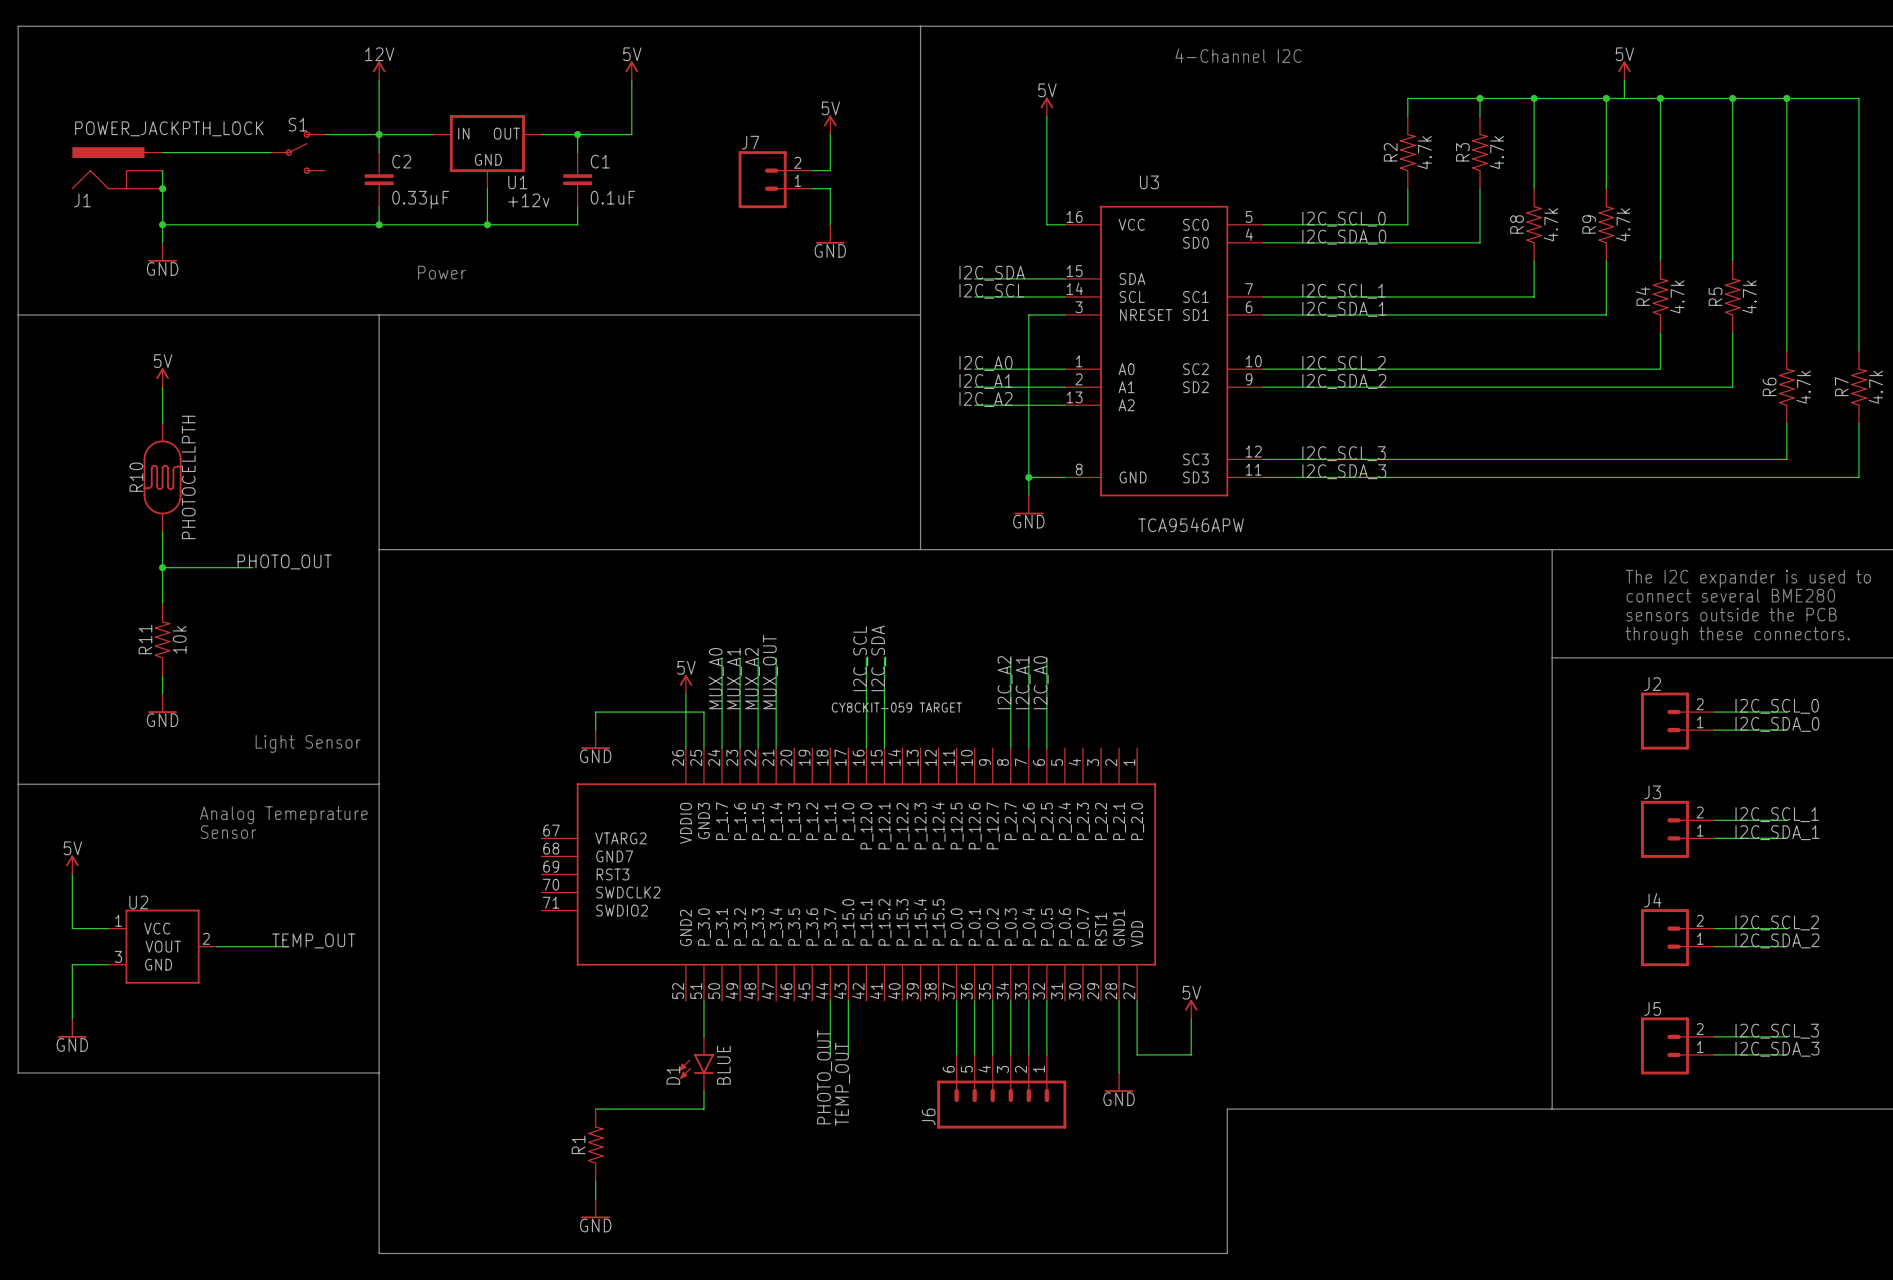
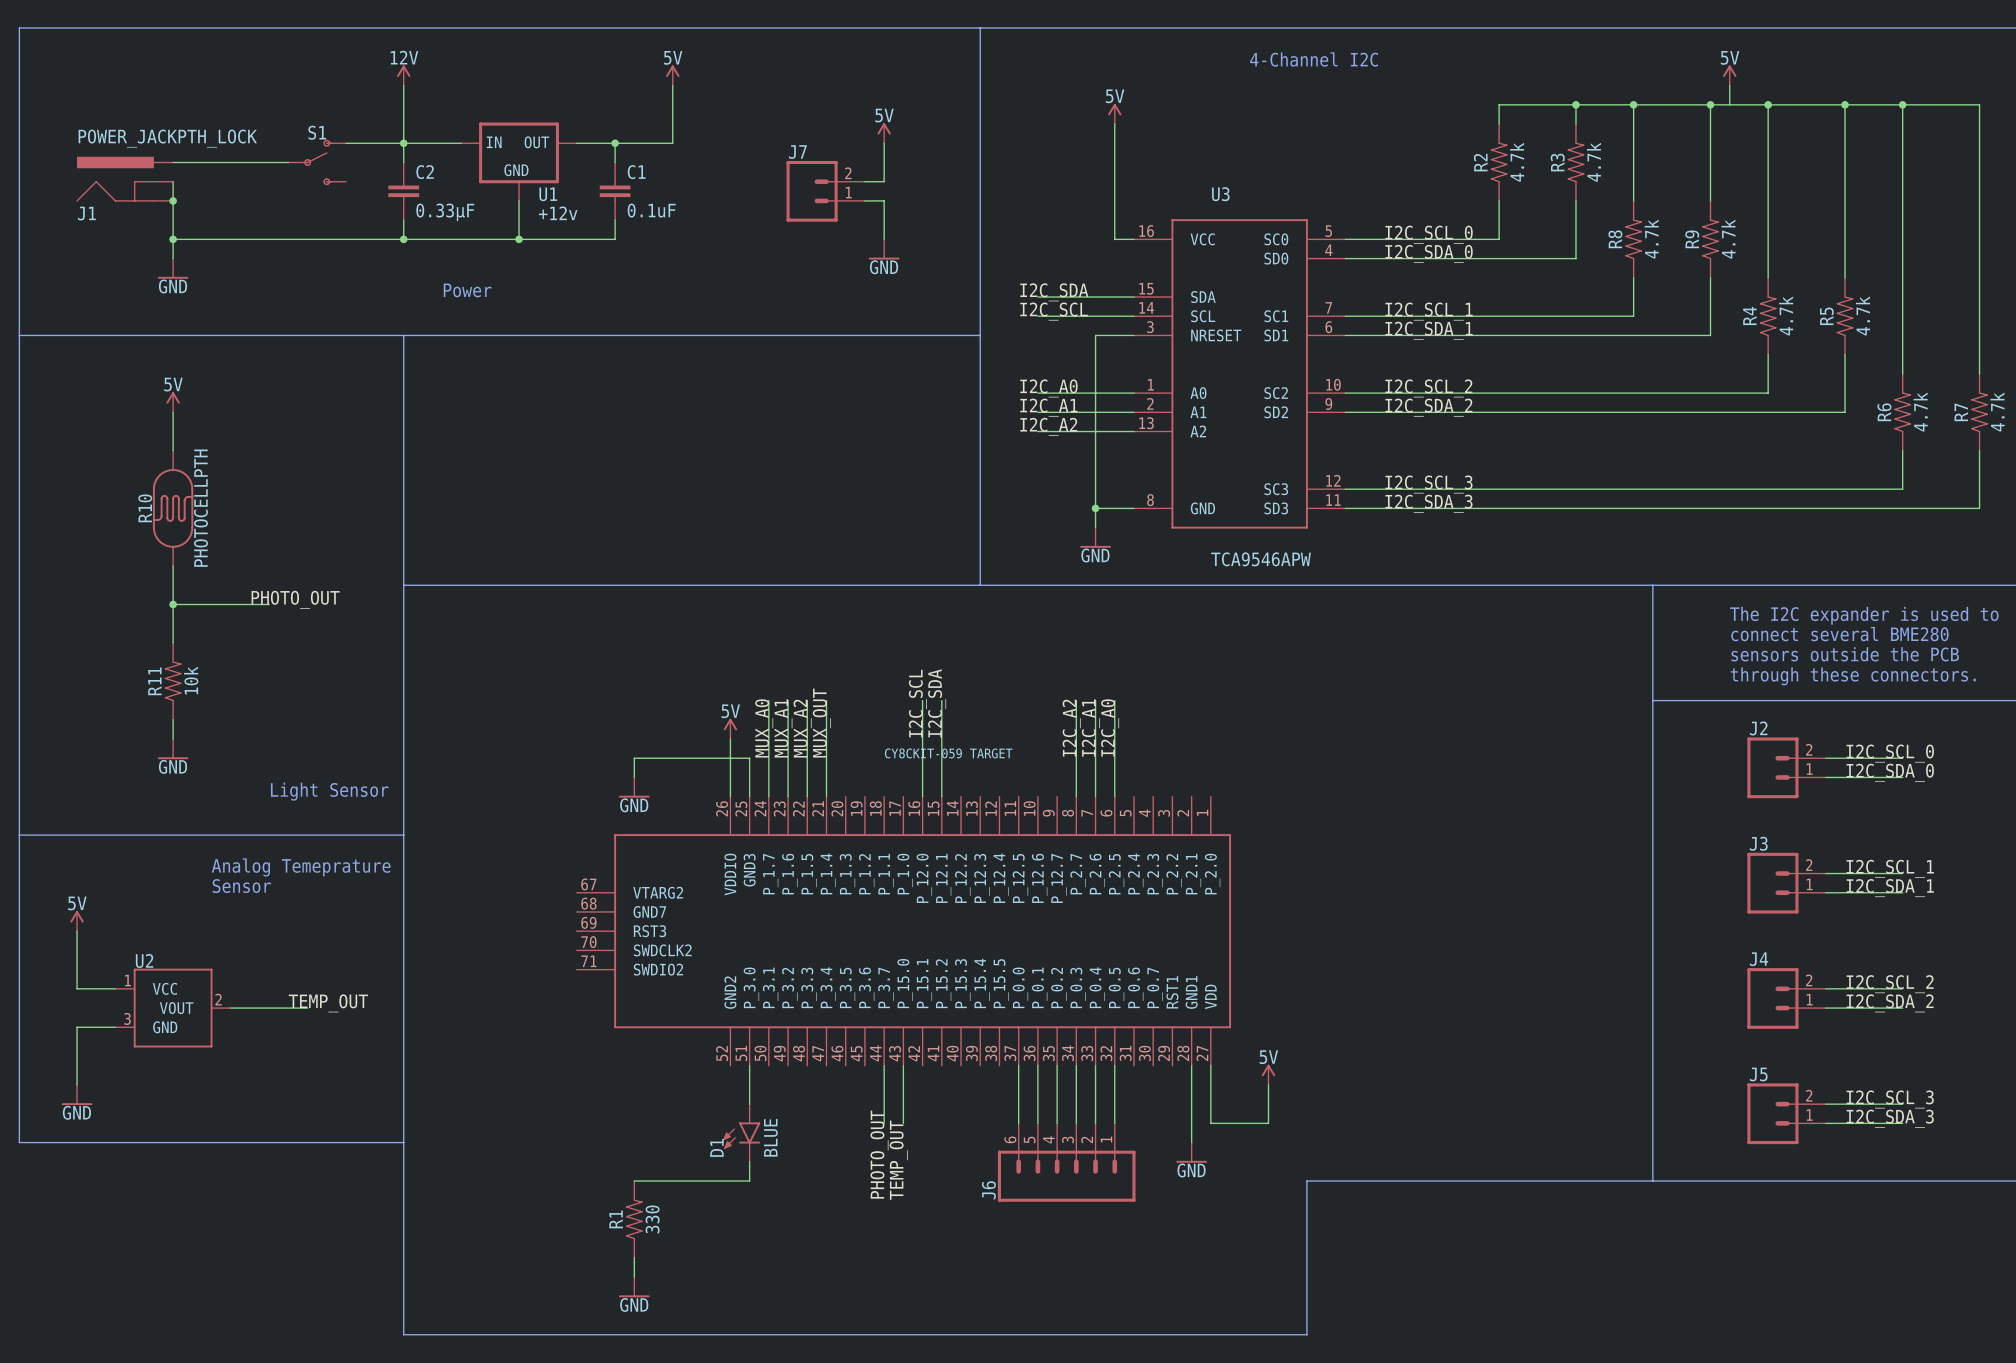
R1 value: none -> 330 (652, 1219)

